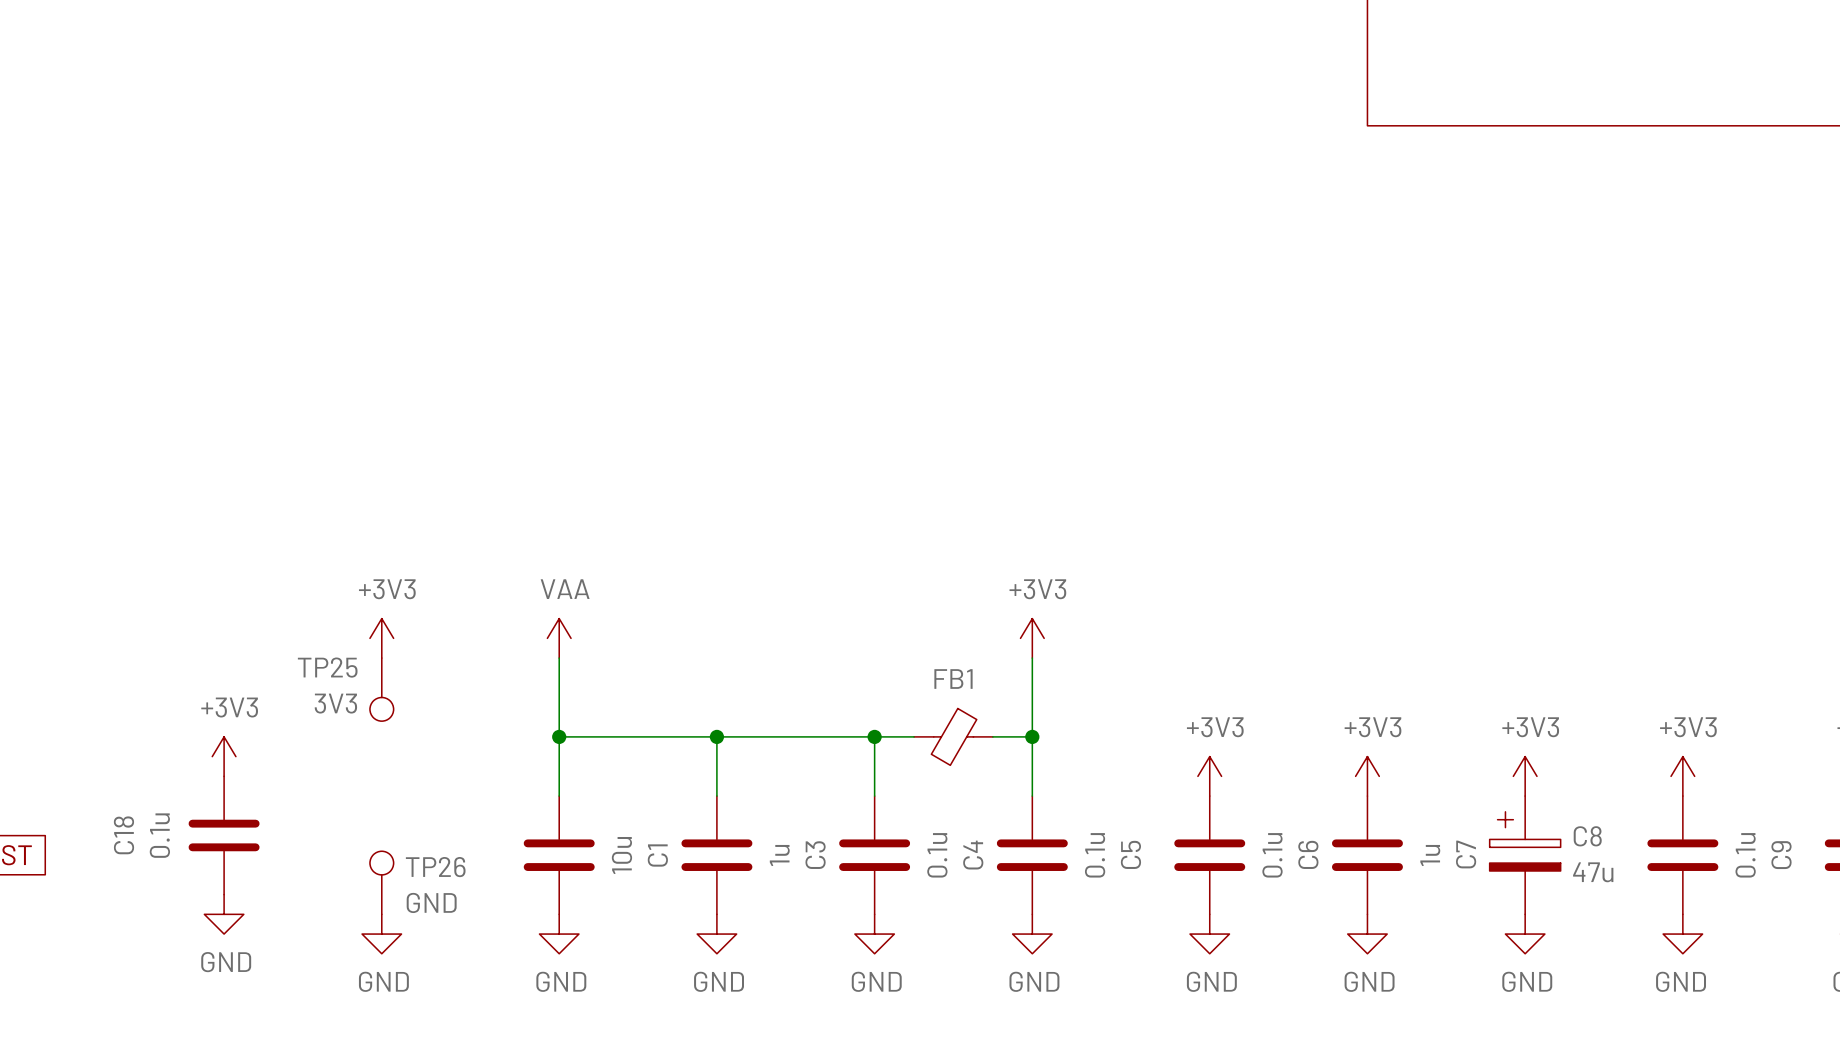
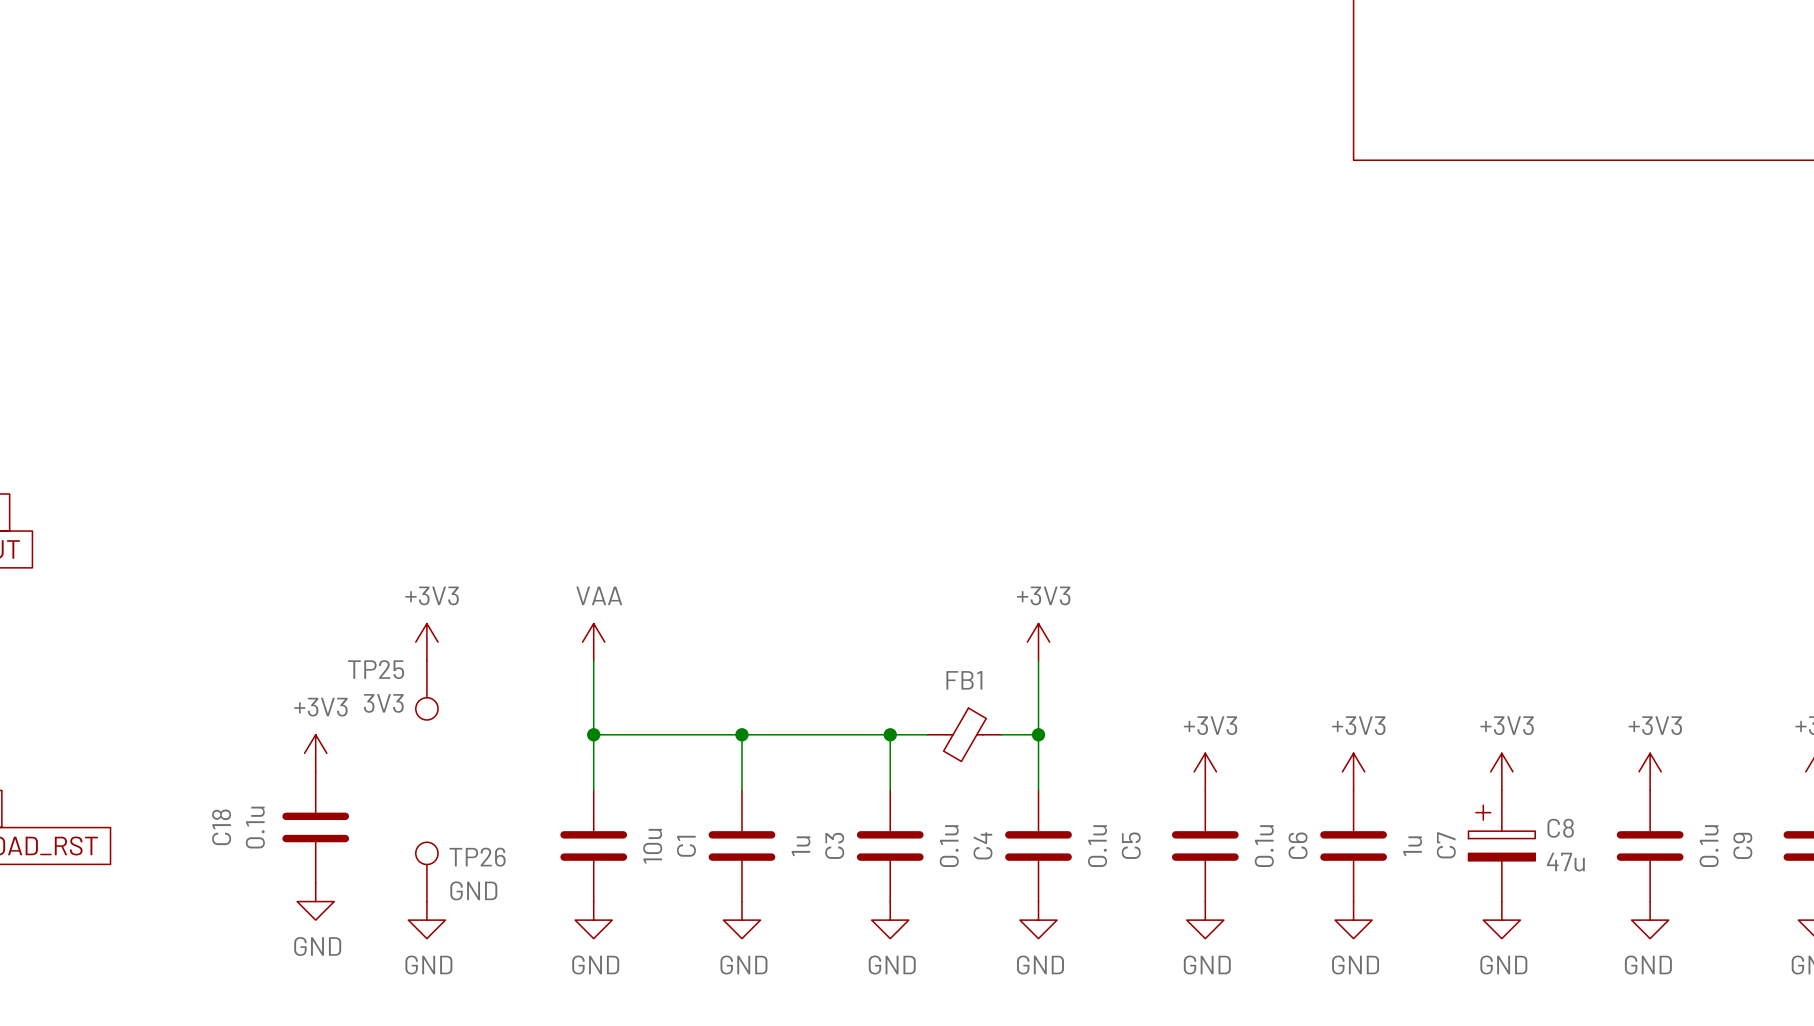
power symbol position: +3V3 (224, 756) -> +3V3 (315, 753)
C18 position: (224, 835) -> (315, 827)
power symbol position: GND (224, 914) -> GND (315, 901)

